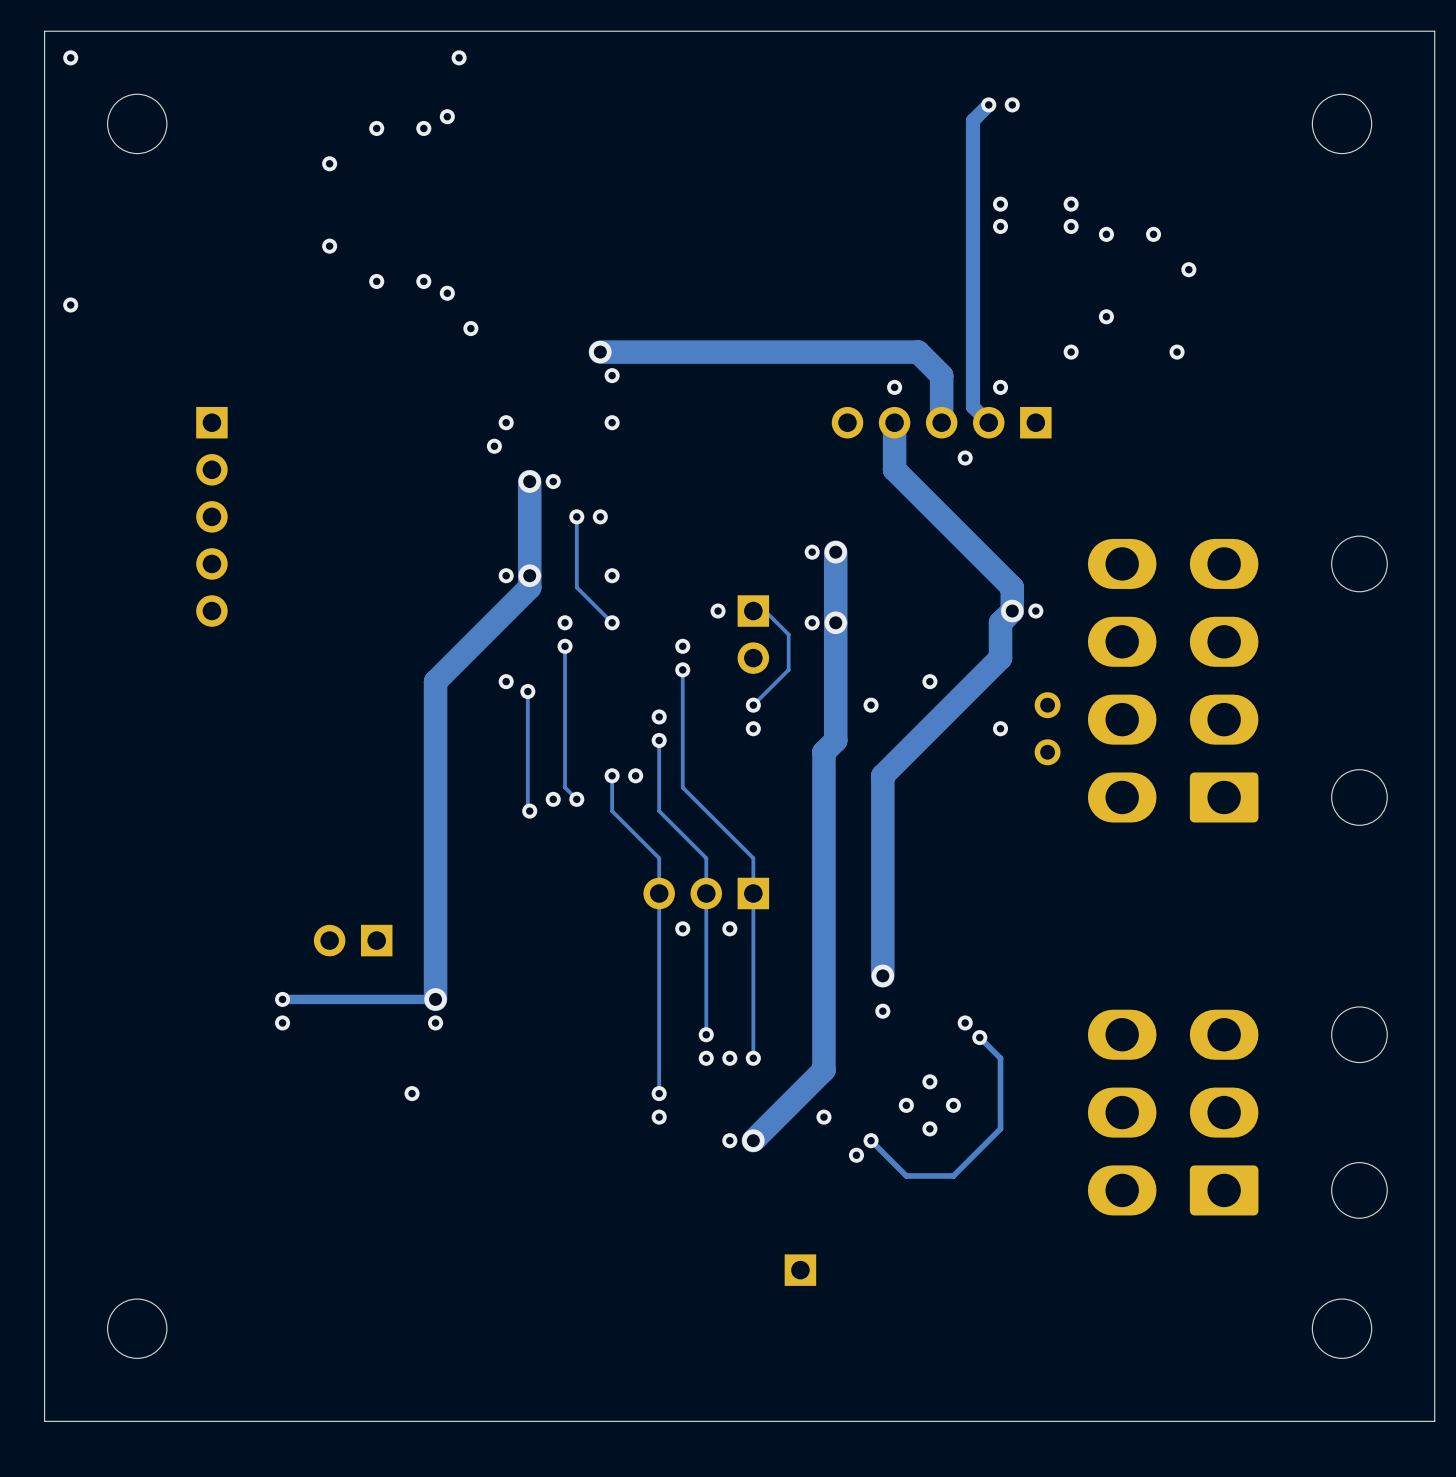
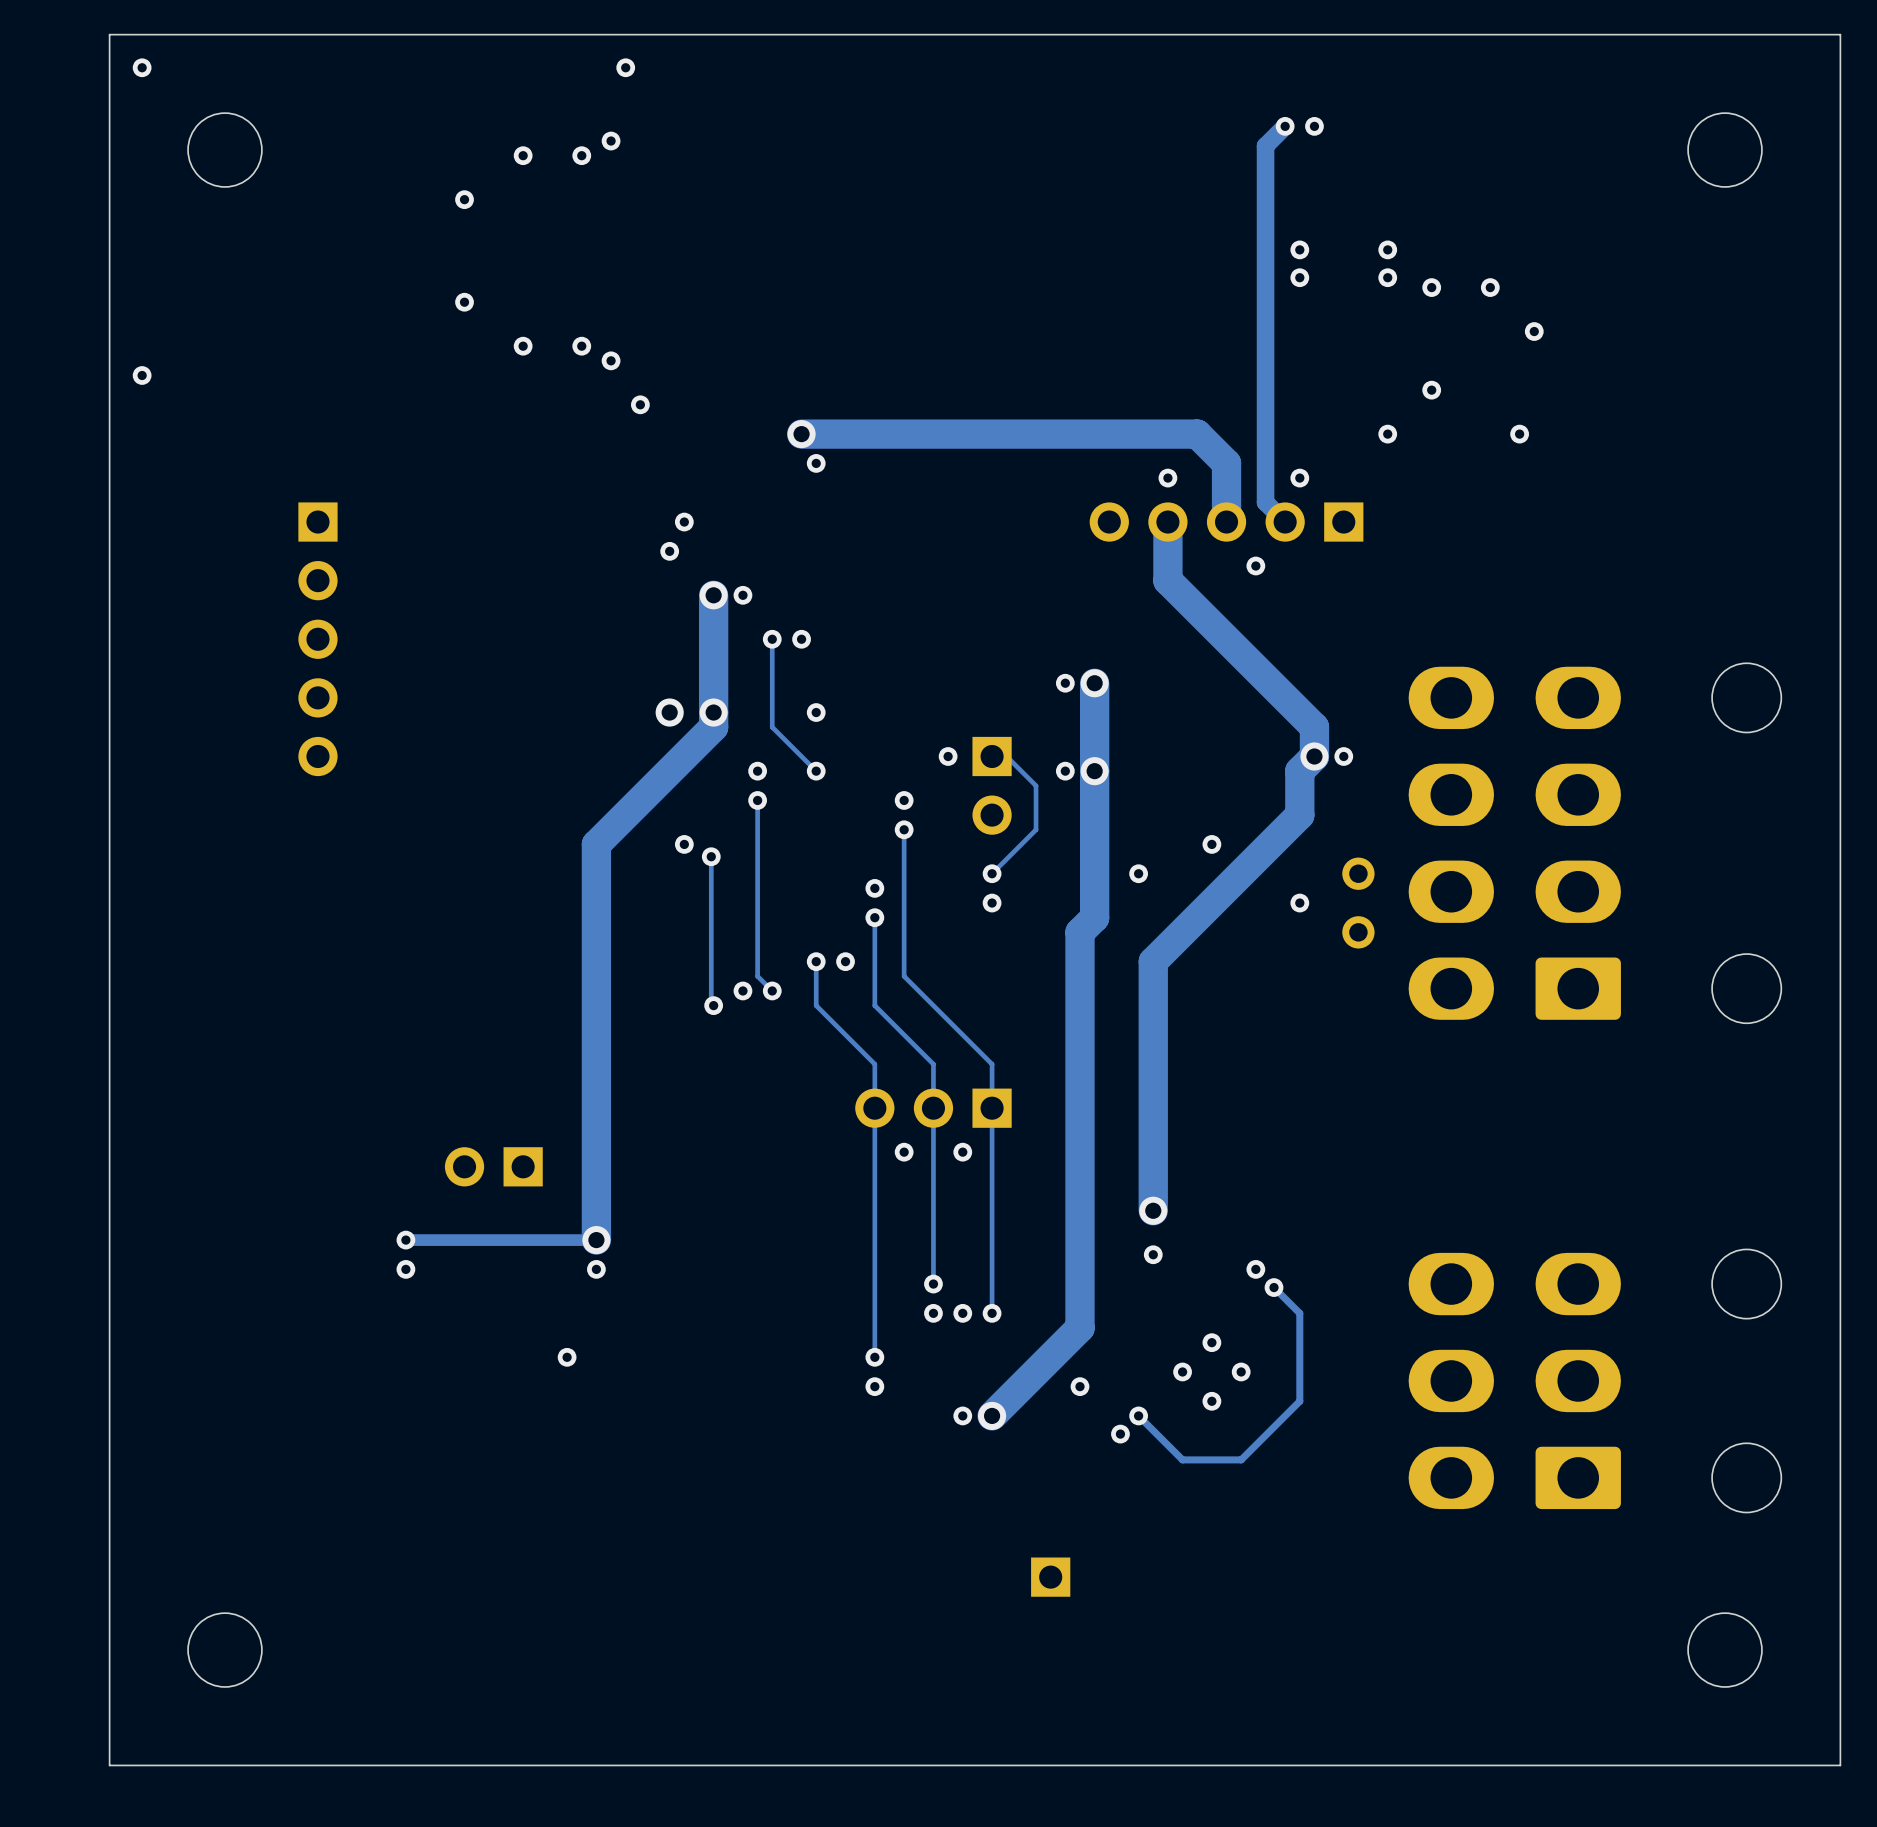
via: (612, 422) -> none
via size: [498, 568, 514, 584] -> [655, 698, 684, 727]

